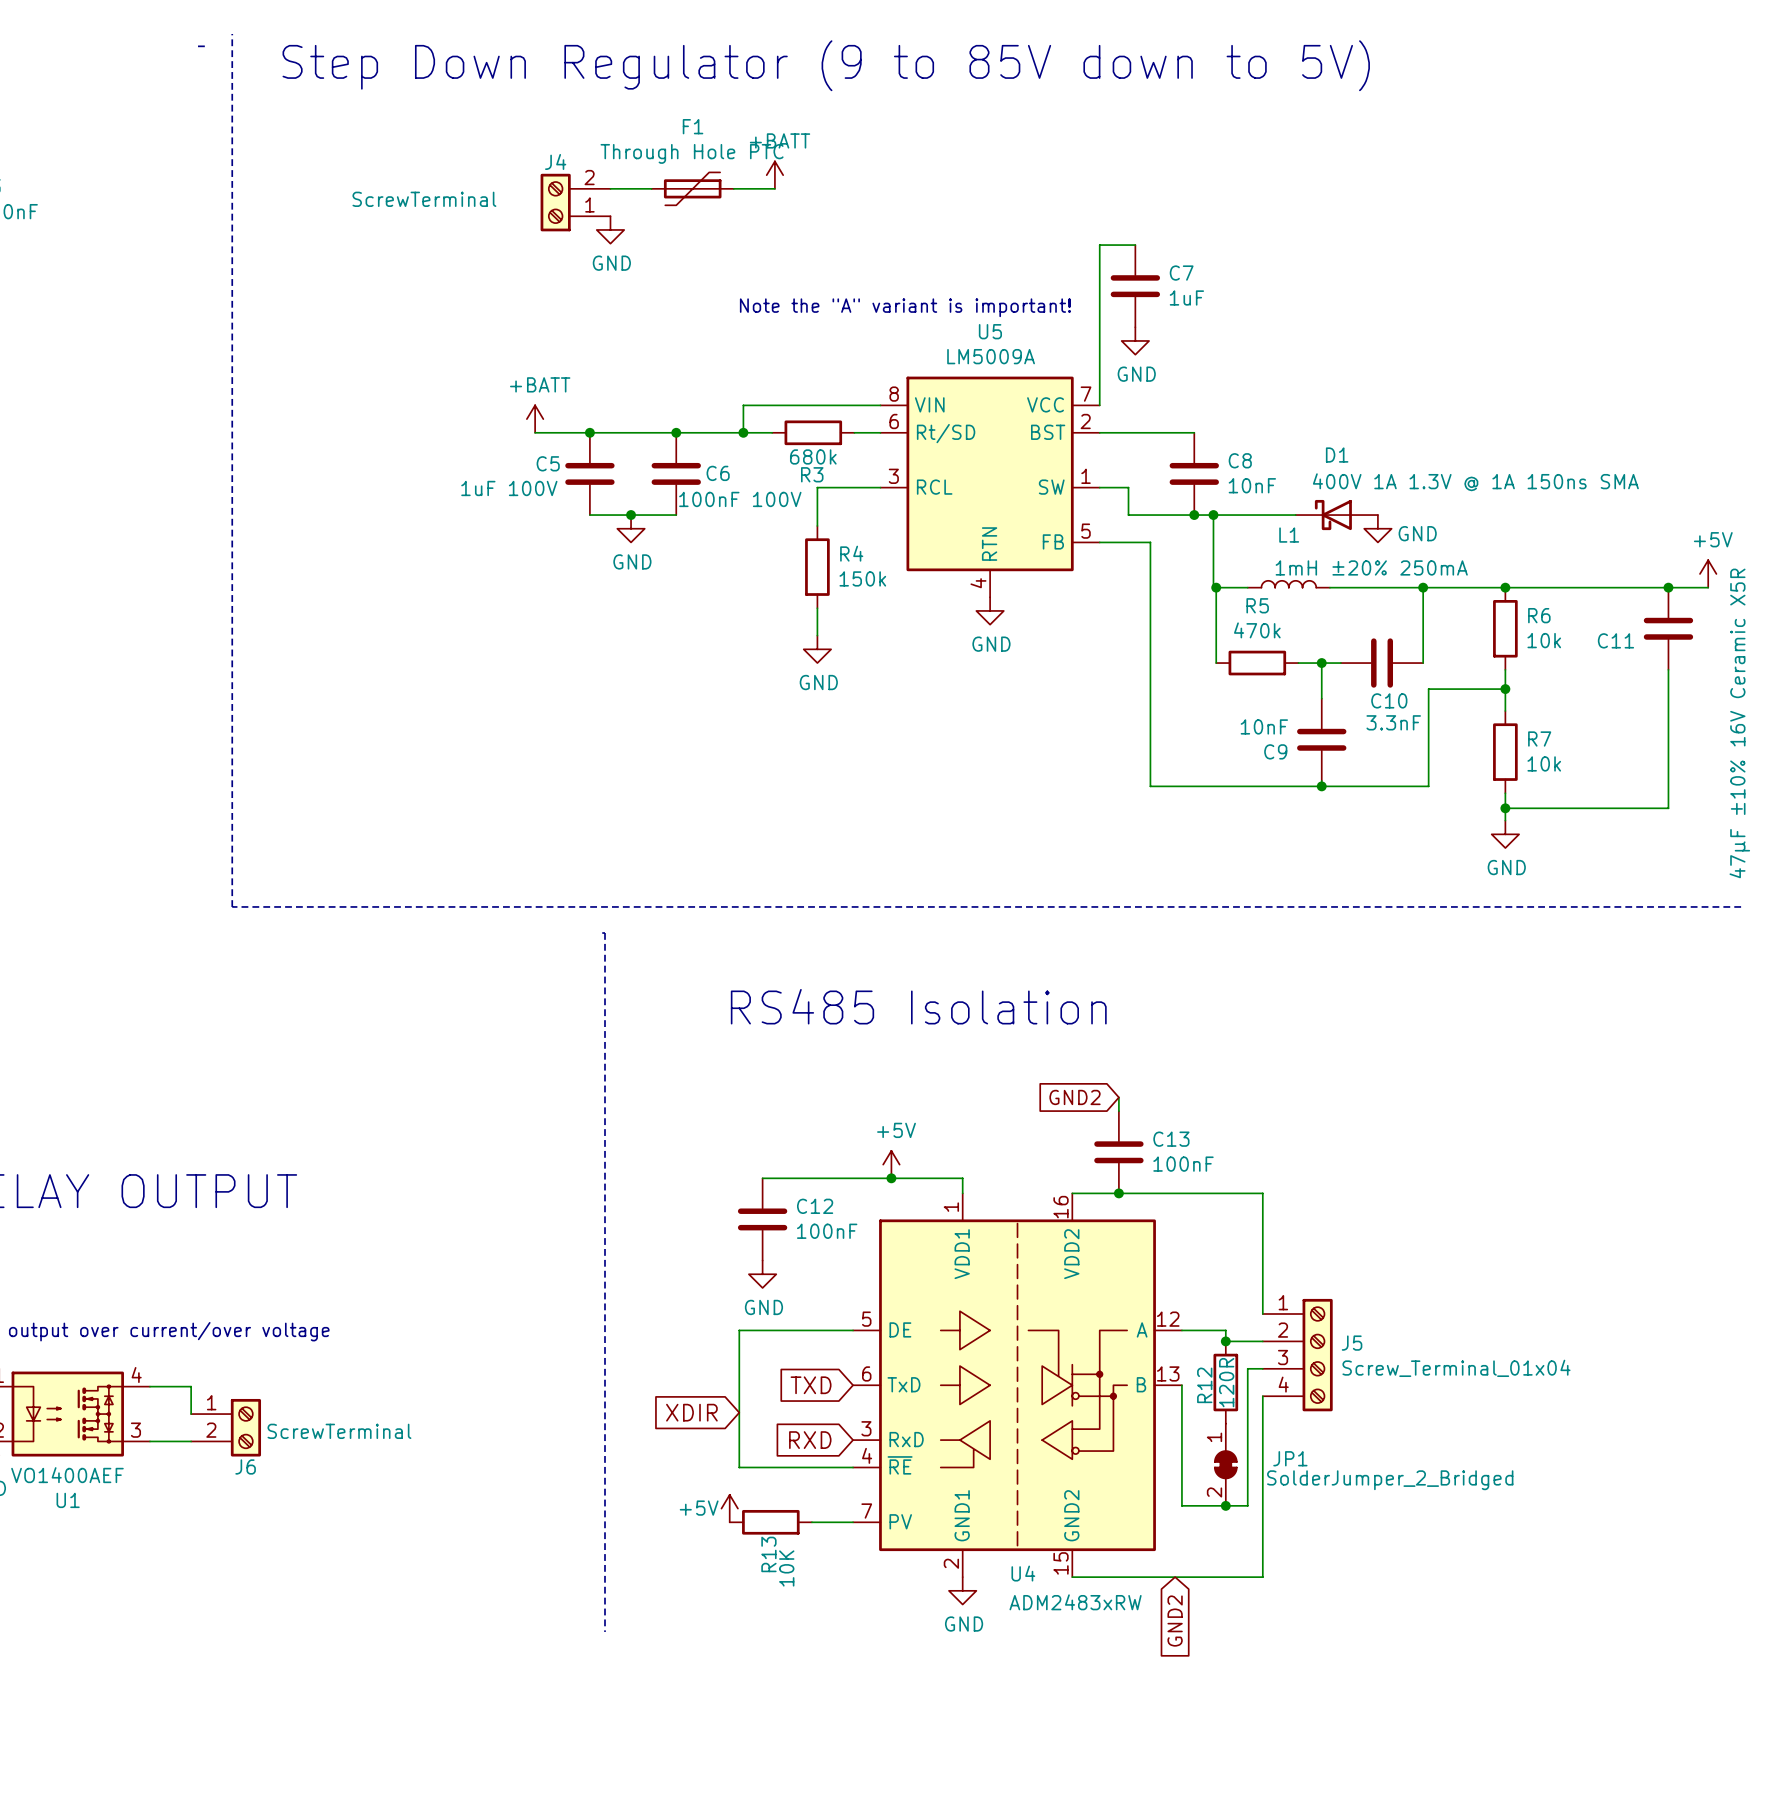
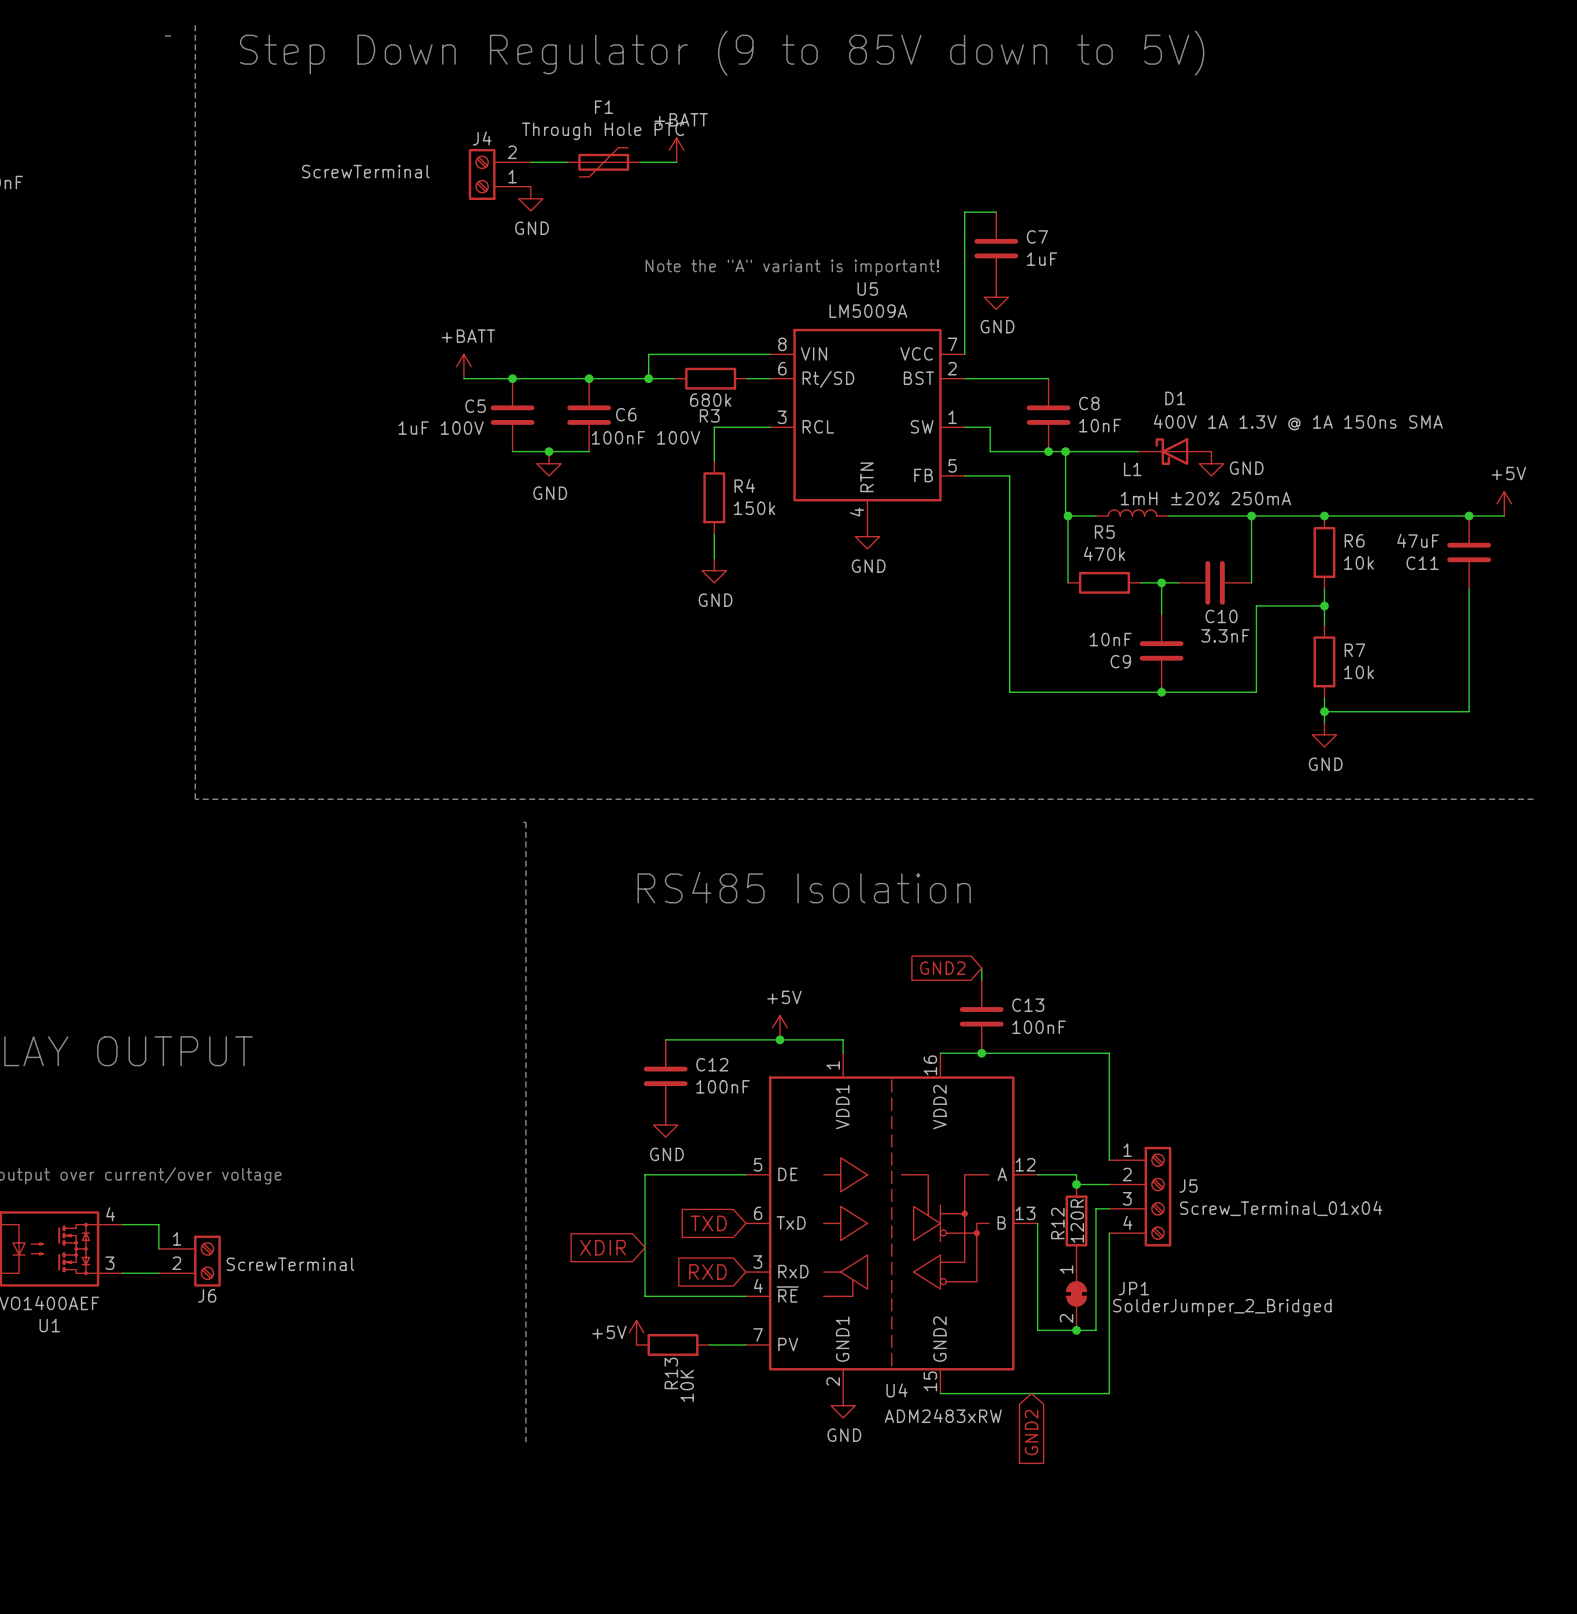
C11 value: 47µF ±10% 16V Ceramic X5R (1739, 723) -> 47uF (1418, 540)

